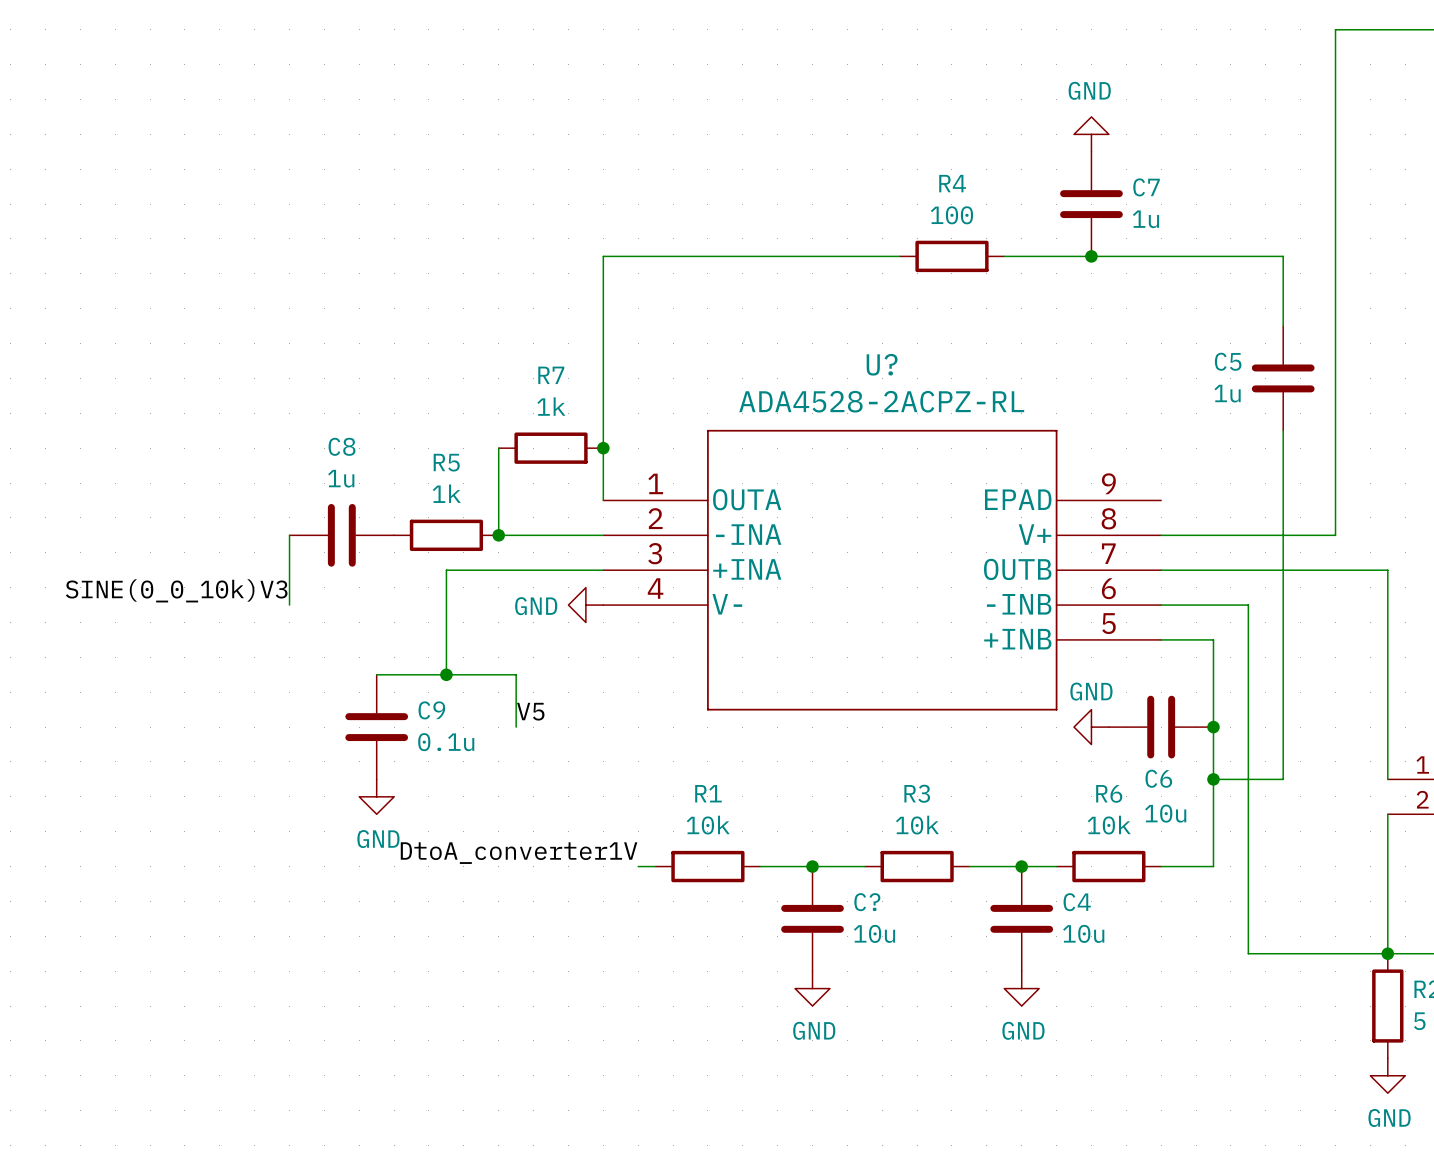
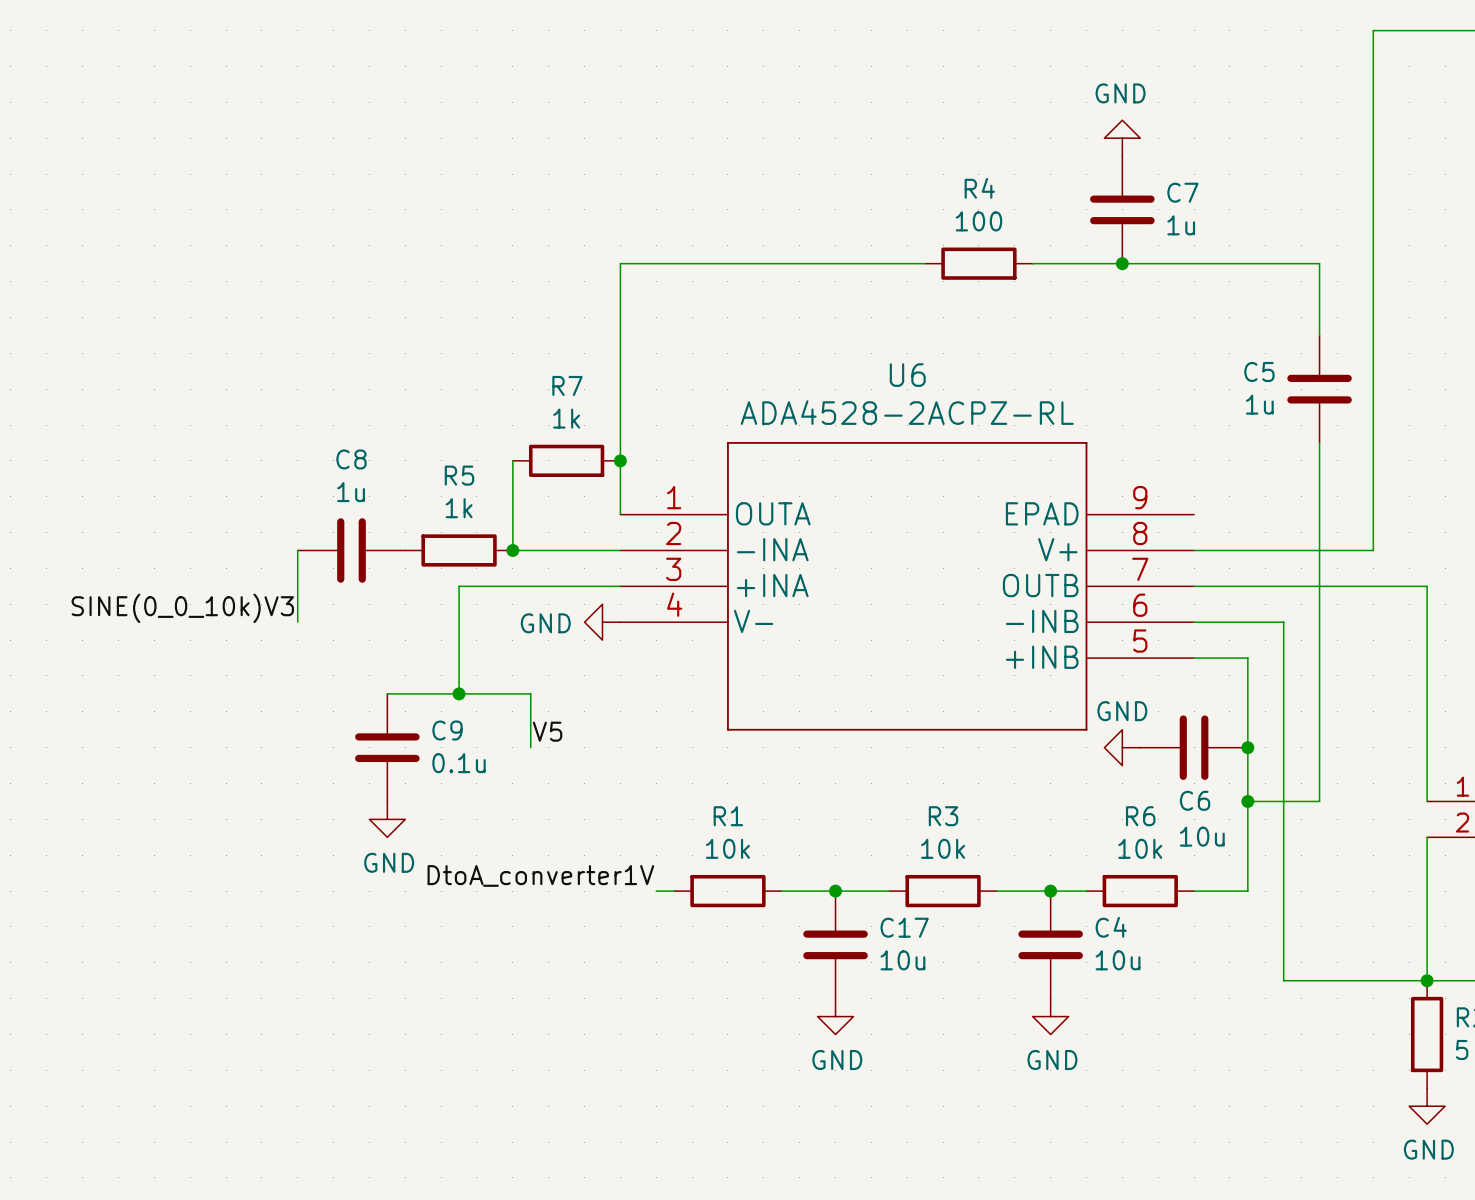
U? name: U? (882, 364) -> U6 (907, 375)
C? name: C? (867, 902) -> C17 (904, 927)

